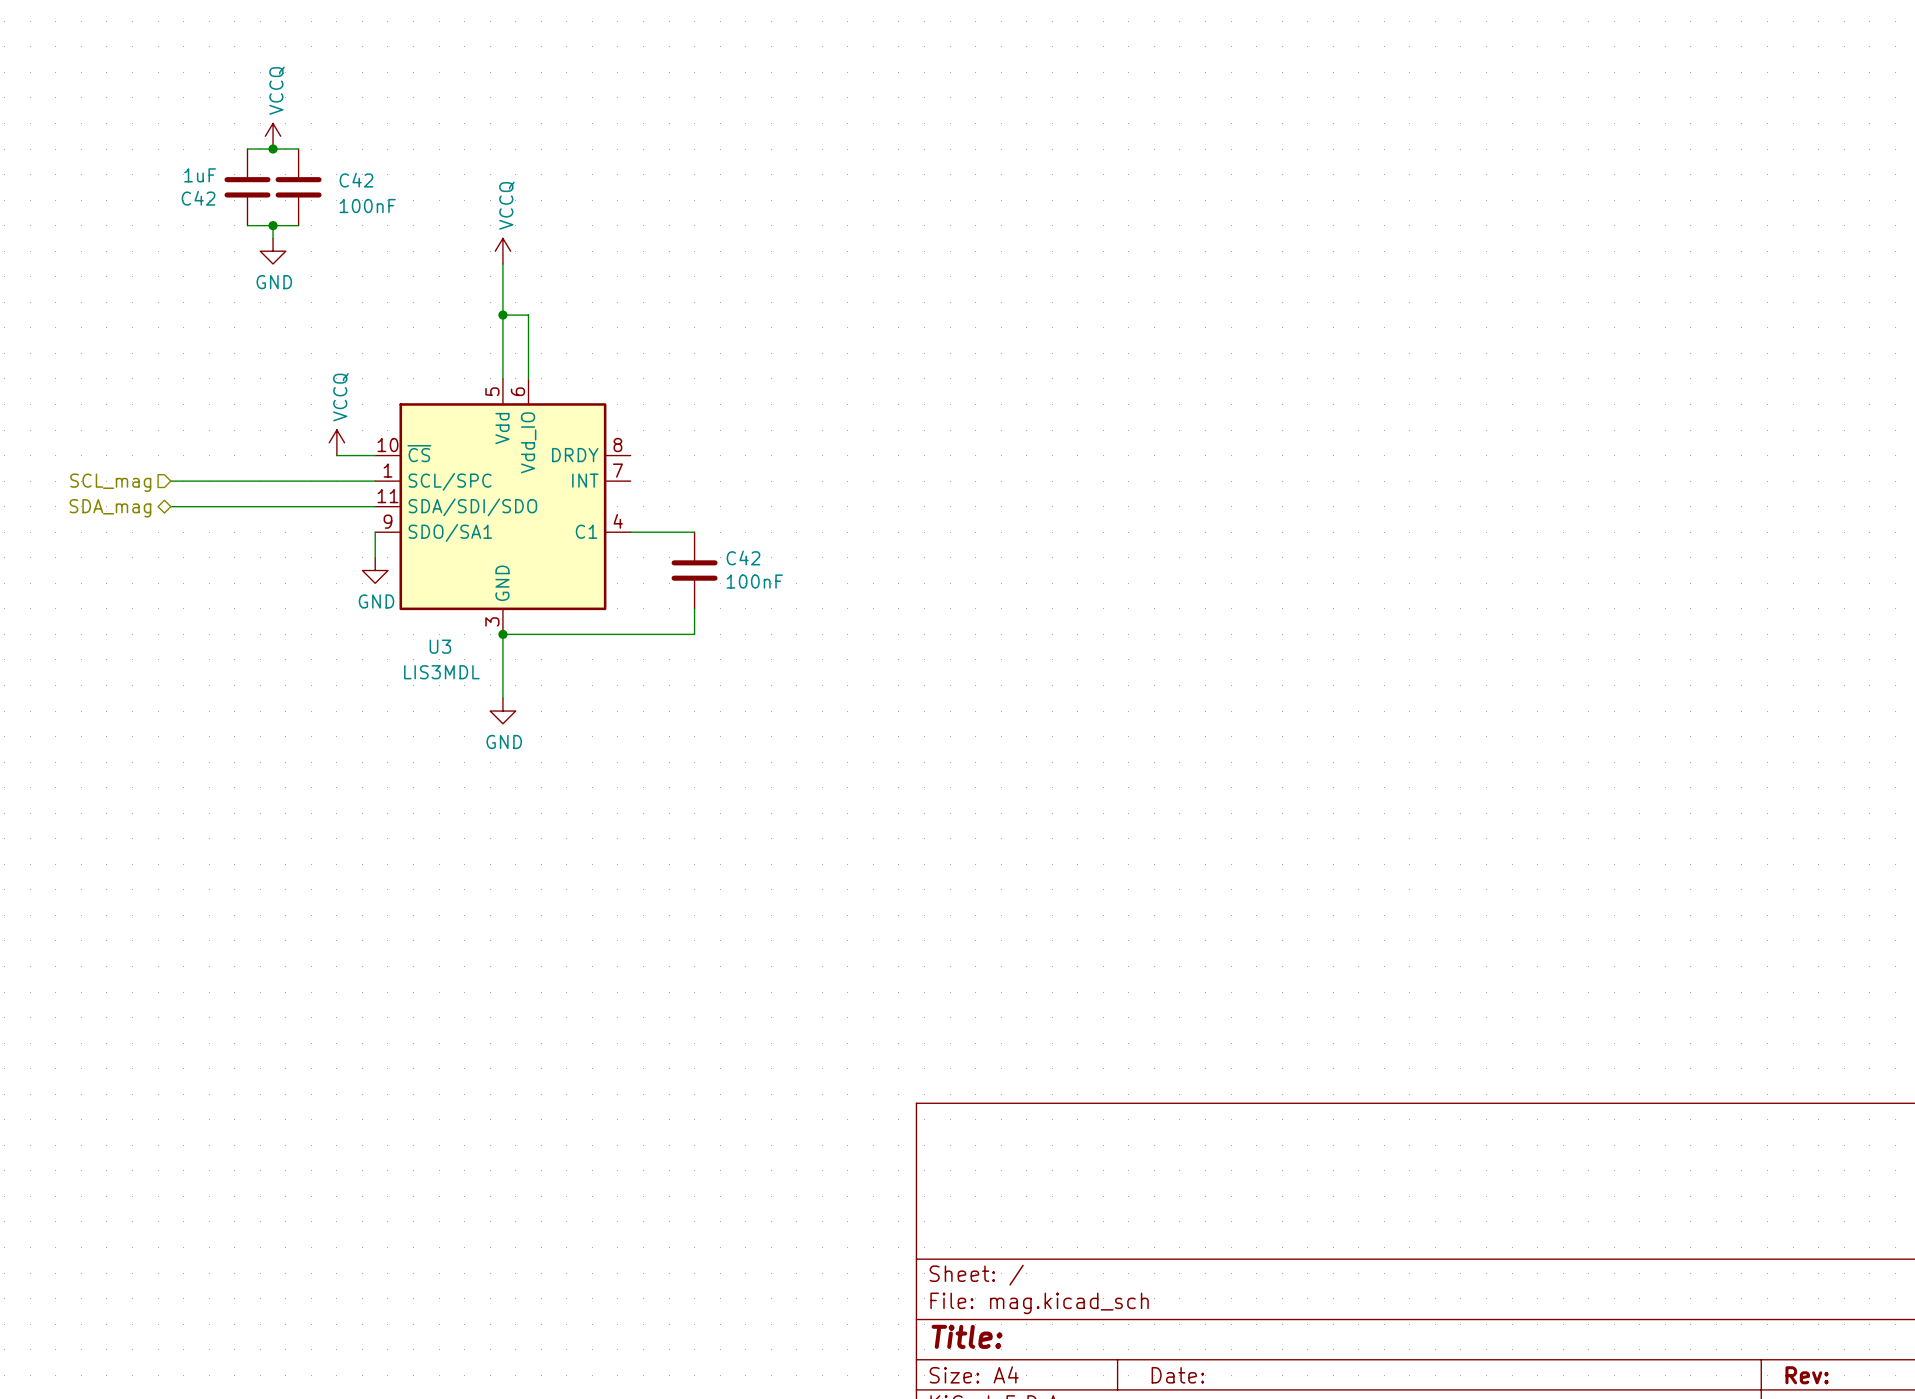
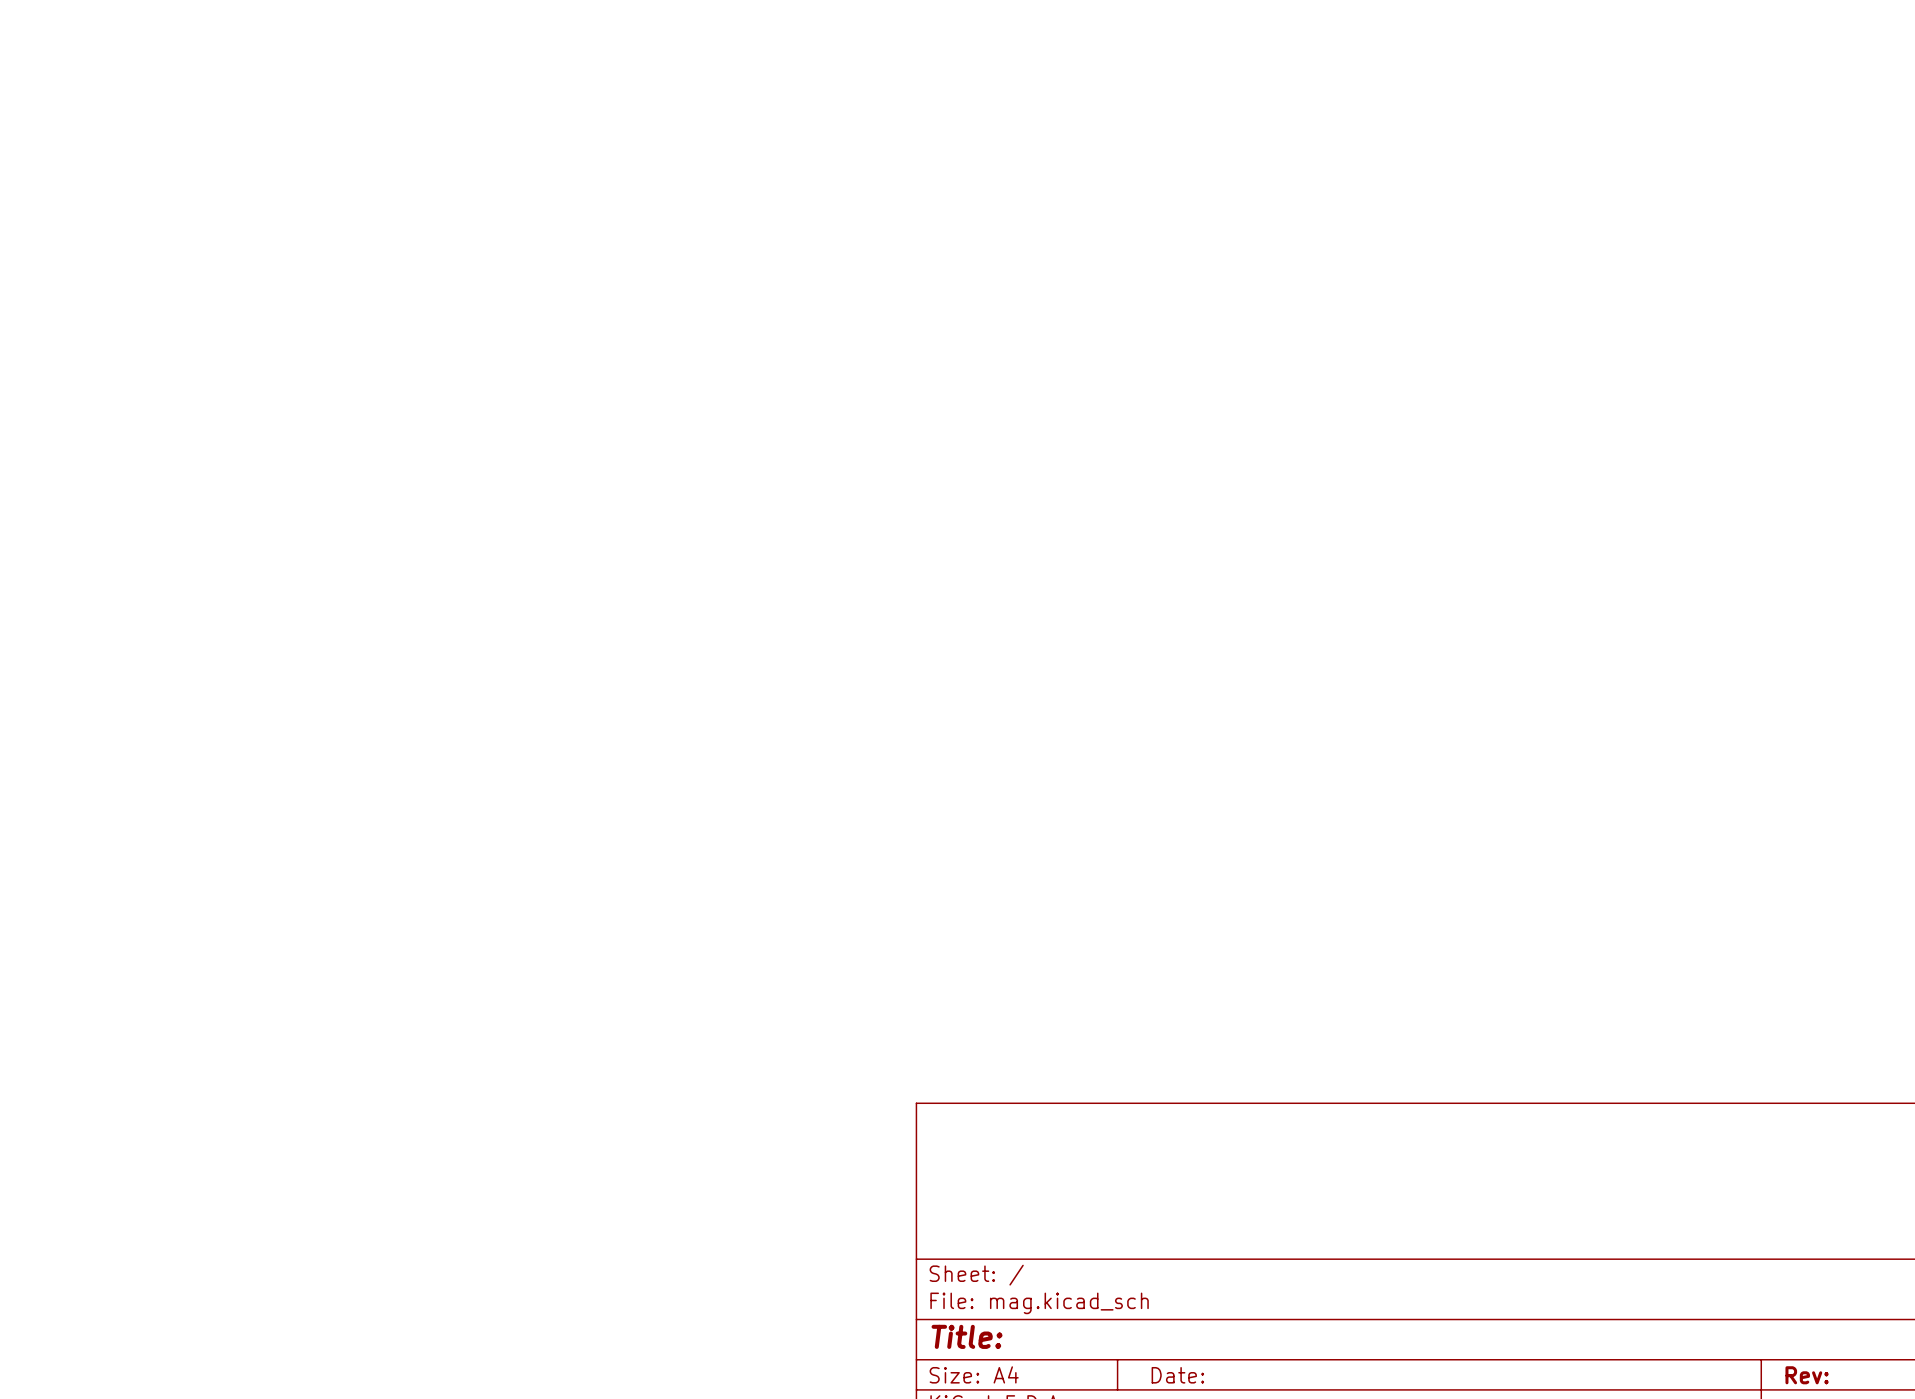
power symbol: VCCQ (273, 136) -> none
wire: (247, 149) (298, 149) -> none
junction: (273, 149) -> none
C42: 1uF (247, 187) -> none
C42: 100nF (298, 187) -> none
wire: (247, 225) (298, 225) -> none
wire: (273, 225) (273, 238) -> none
junction: (273, 225) -> none
power symbol: GND (273, 251) -> none
power symbol: VCCQ (502, 251) -> none
wire: (502, 263) (502, 378) -> none
wire: (502, 315) (528, 315) (528, 378) -> none
junction: (502, 315) -> none
power symbol: VCCQ (336, 442) -> none
wire: (336, 455) (375, 455) -> none
wire: (170, 481) (375, 481) -> none
hierarchical label: SCL_mag (110, 482) -> none
wire: (170, 506) (375, 506) -> none
U3: LIS3MDL (502, 506) -> none
hierarchical label: SDA_mag (110, 508) -> none
wire: (375, 532) (375, 557) -> none
wire: (630, 532) (694, 532) -> none
power symbol: GND (375, 570) -> none
C42: 100nF (694, 570) -> none
wire: (694, 608) (694, 634) (502, 634) (502, 698) -> none
junction: (502, 634) -> none
power symbol: GND (502, 711) -> none

